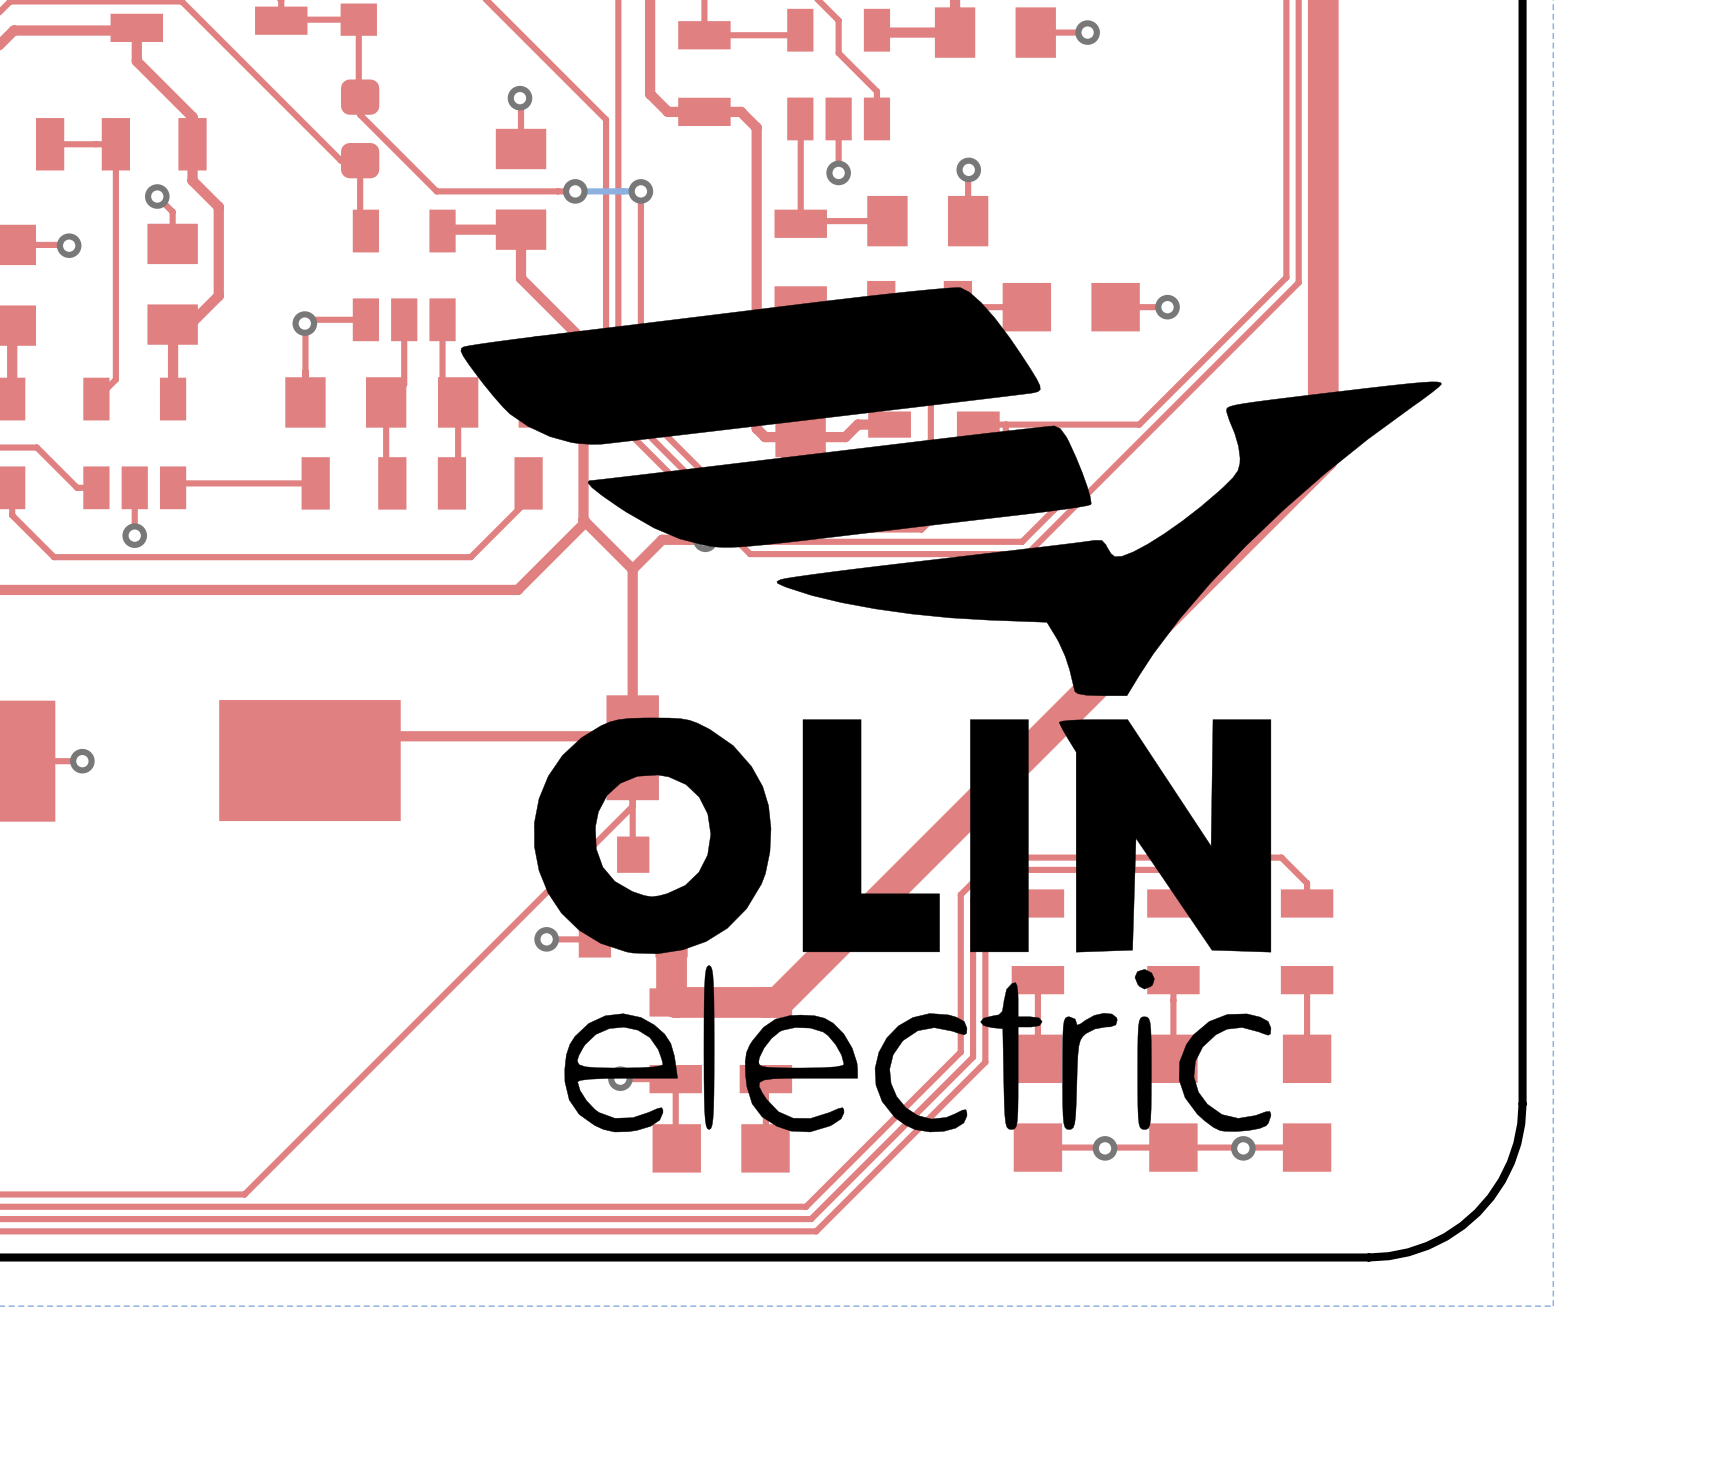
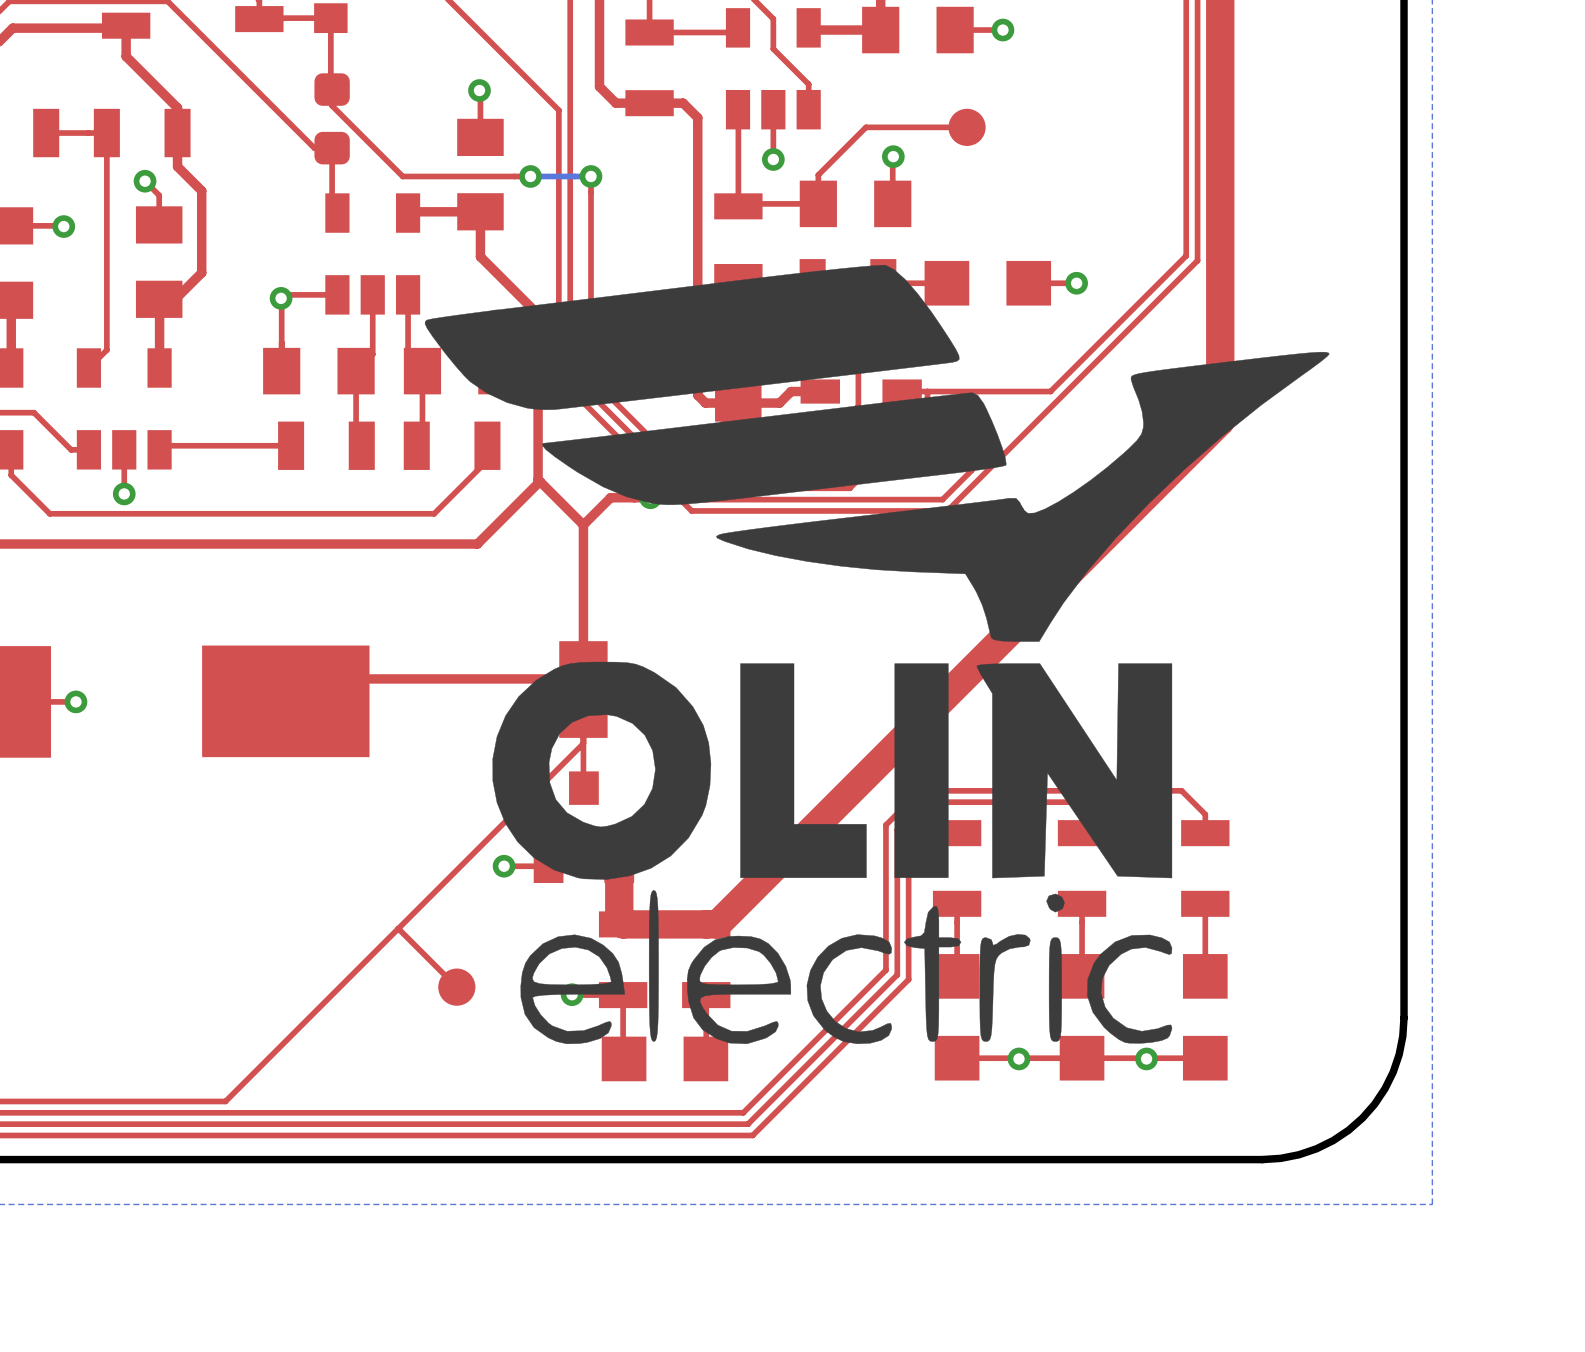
top track: none -> (967, 127) (865, 127) (818, 174) (818, 203)
part: none -> (967, 127)
top track: none -> (398, 928) (456, 987)
part: none -> (456, 987)

